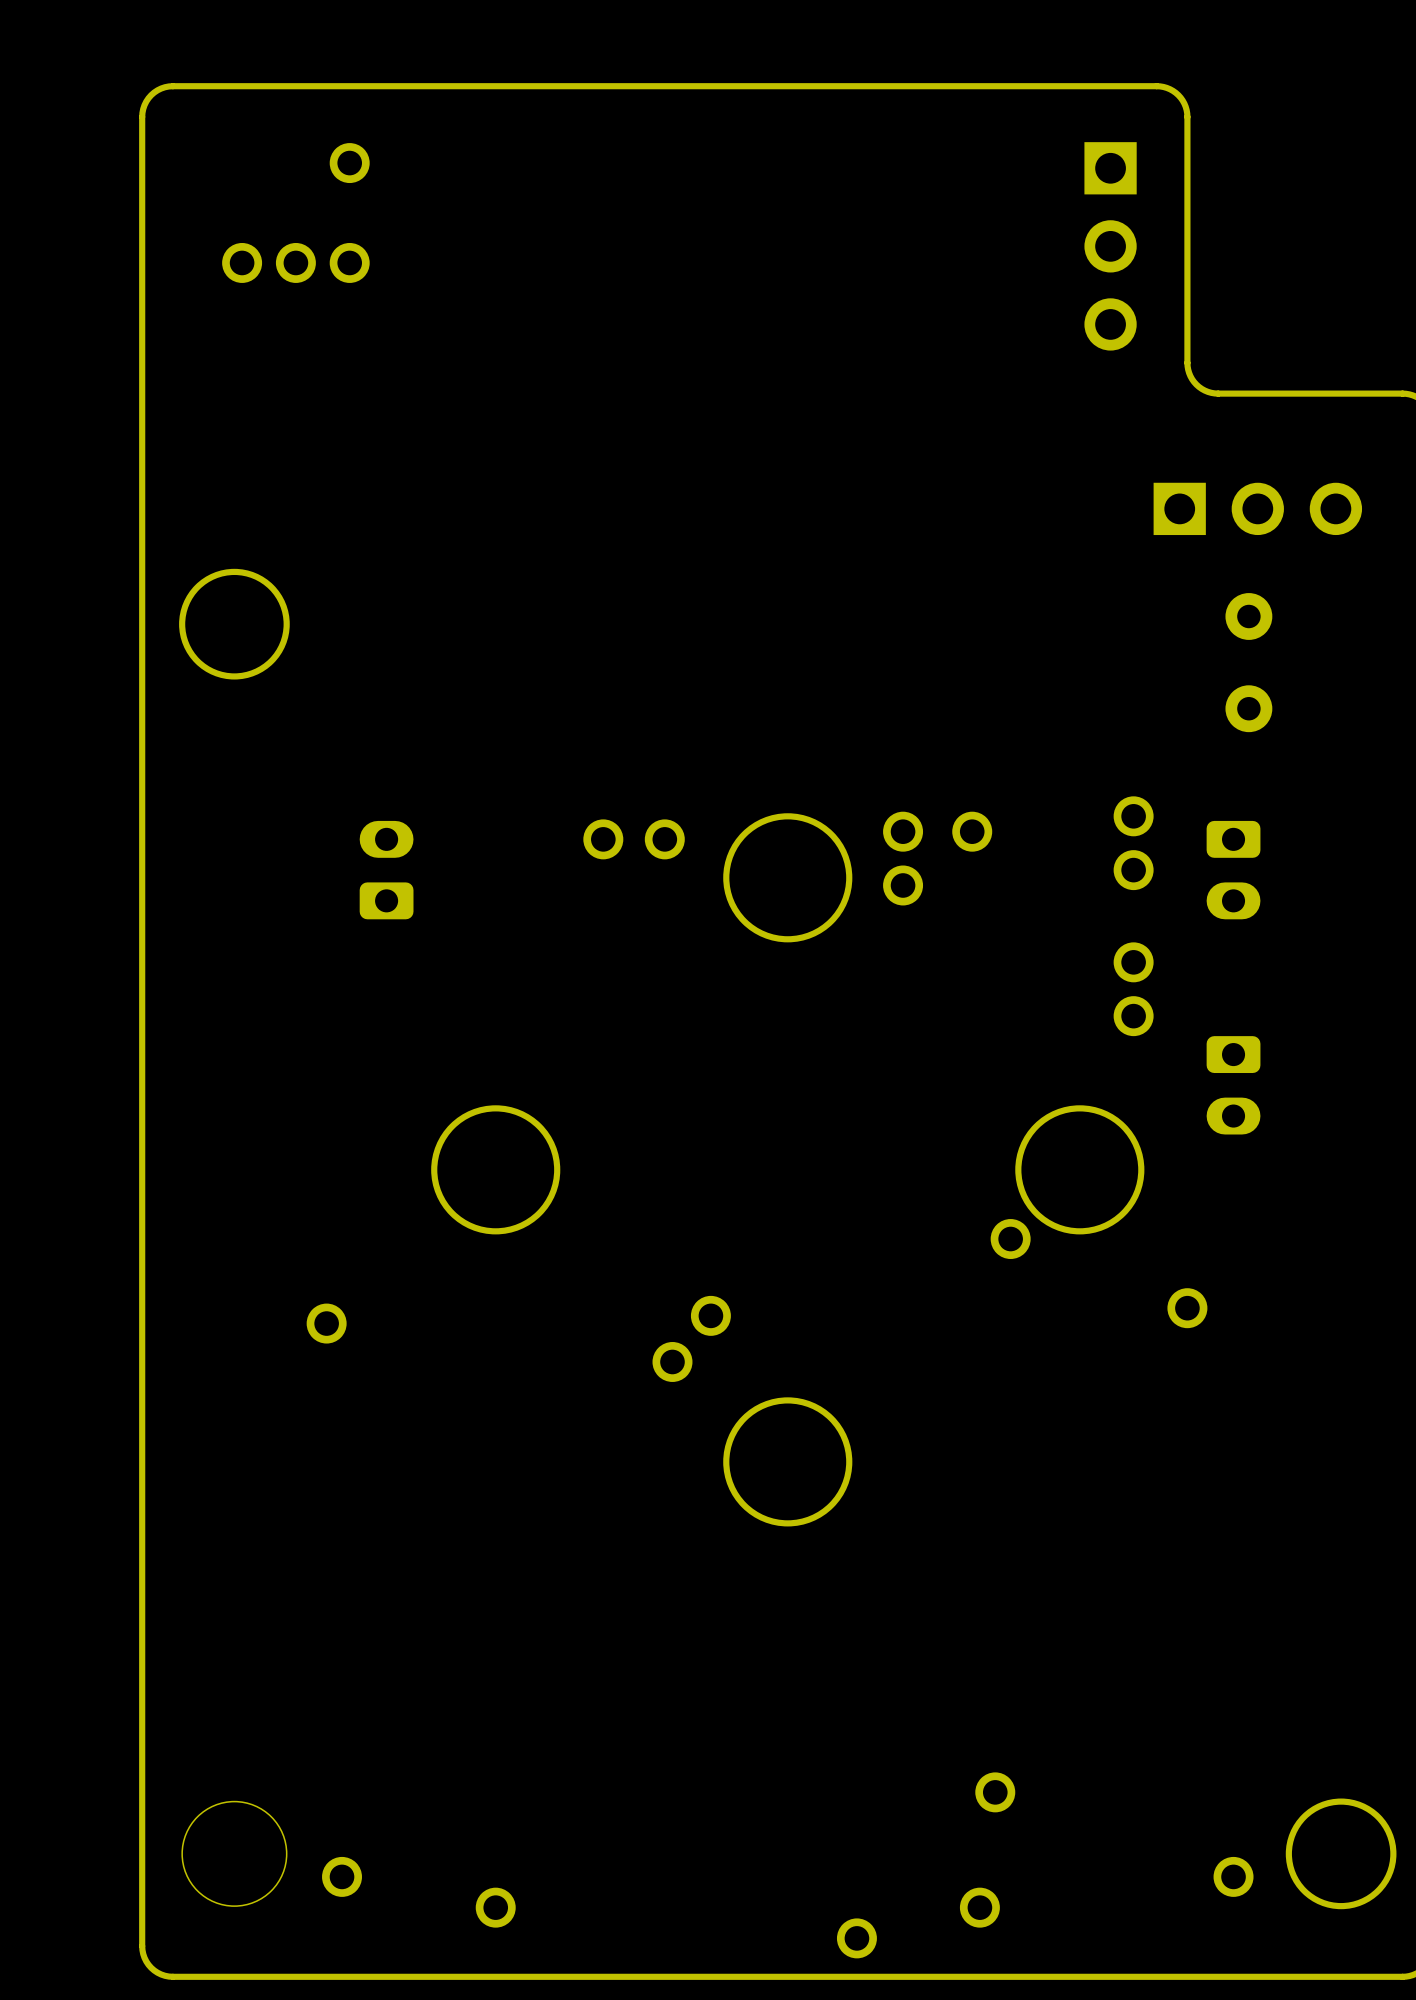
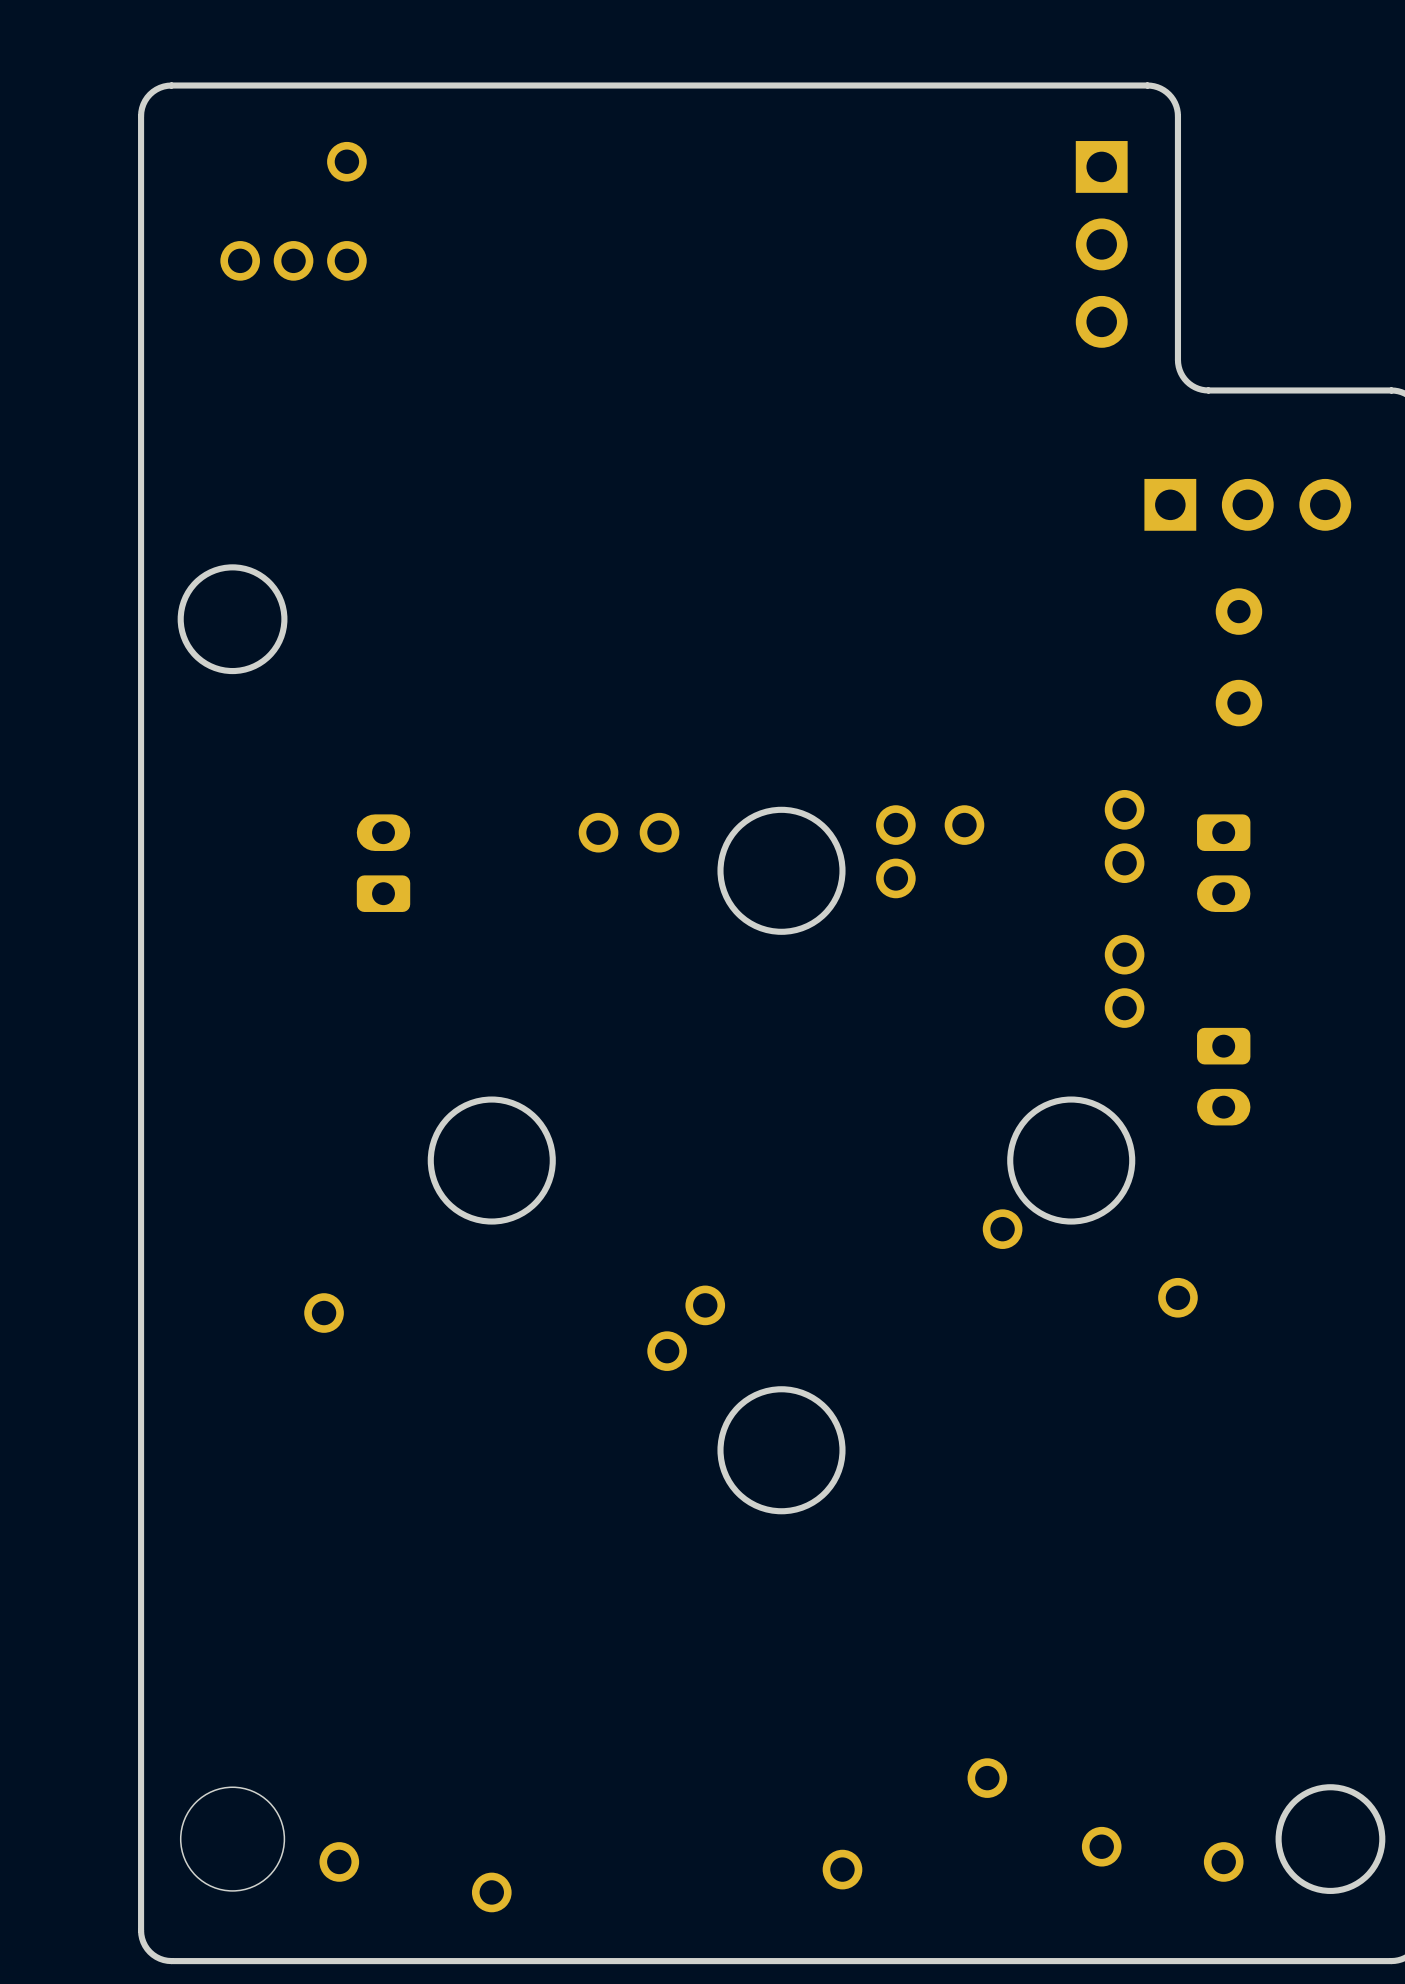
part: none -> (1101, 1846)
part: (979, 1907) -> none
part position: (856, 1938) -> (842, 1869)

